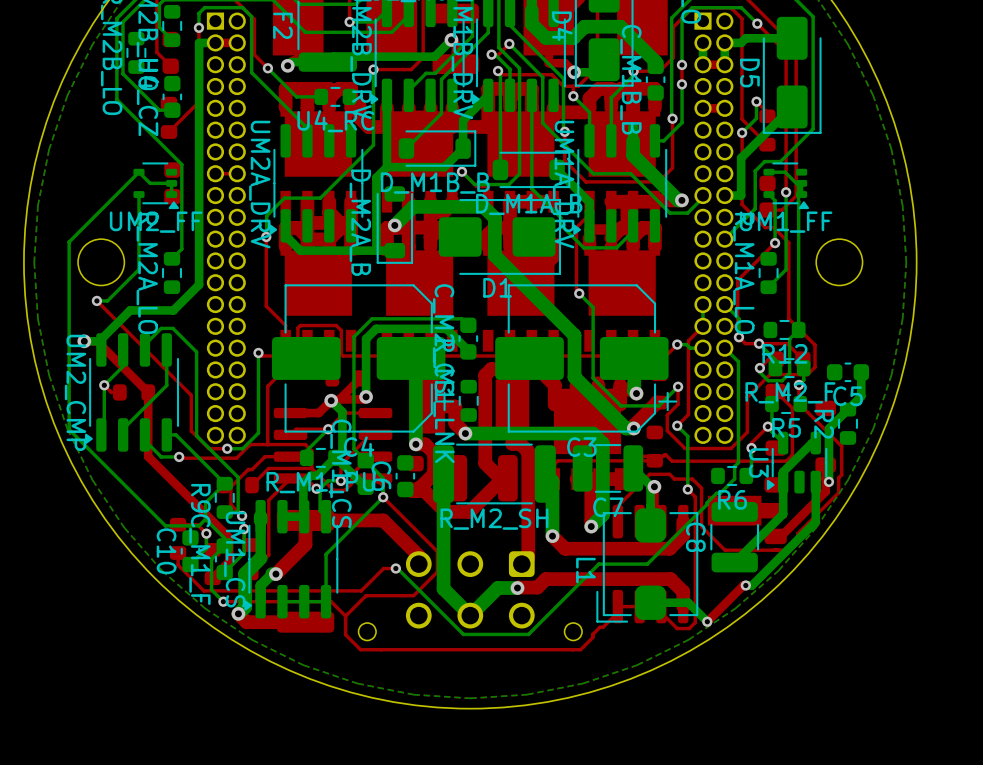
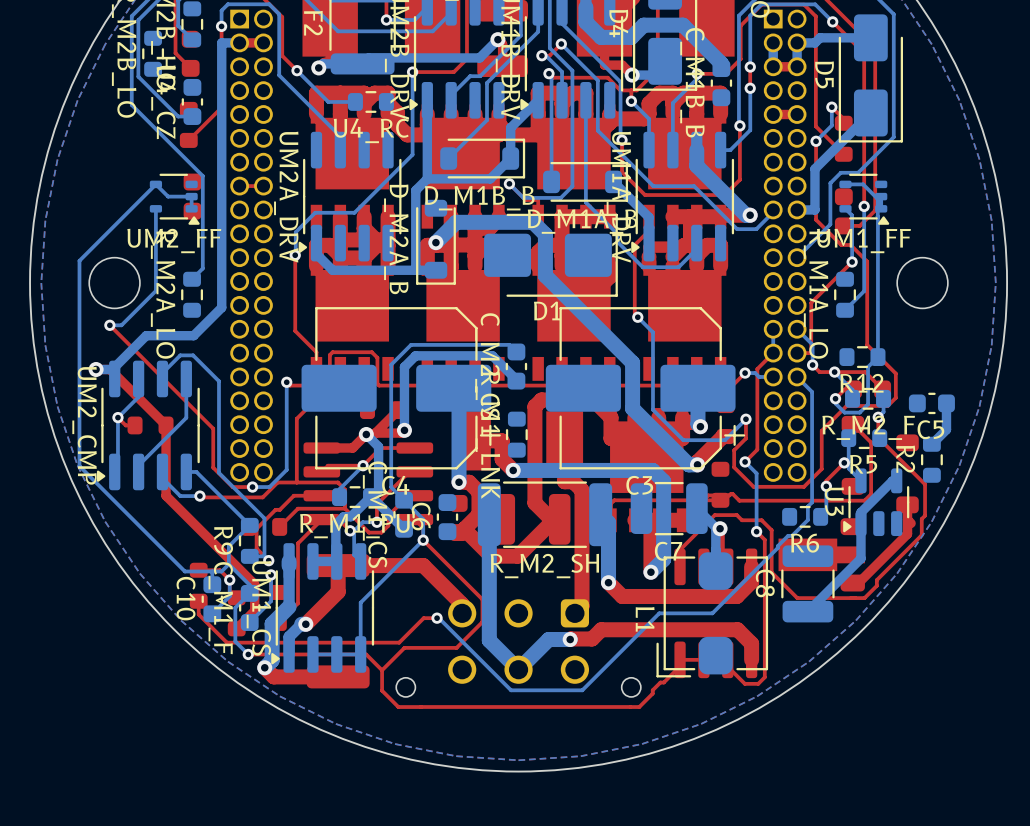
bottom track: (847, 409) (828, 428) (828, 481) -> none
via: (828, 481) -> none
bottom track: (815, 482) (815, 521) (752, 585) (745, 585) -> none
top track: (745, 585) (743, 585) (707, 621) -> none
via: (745, 585) -> none
bottom track: (650, 602) (688, 602) (707, 621) -> none
via: (707, 621) -> none

